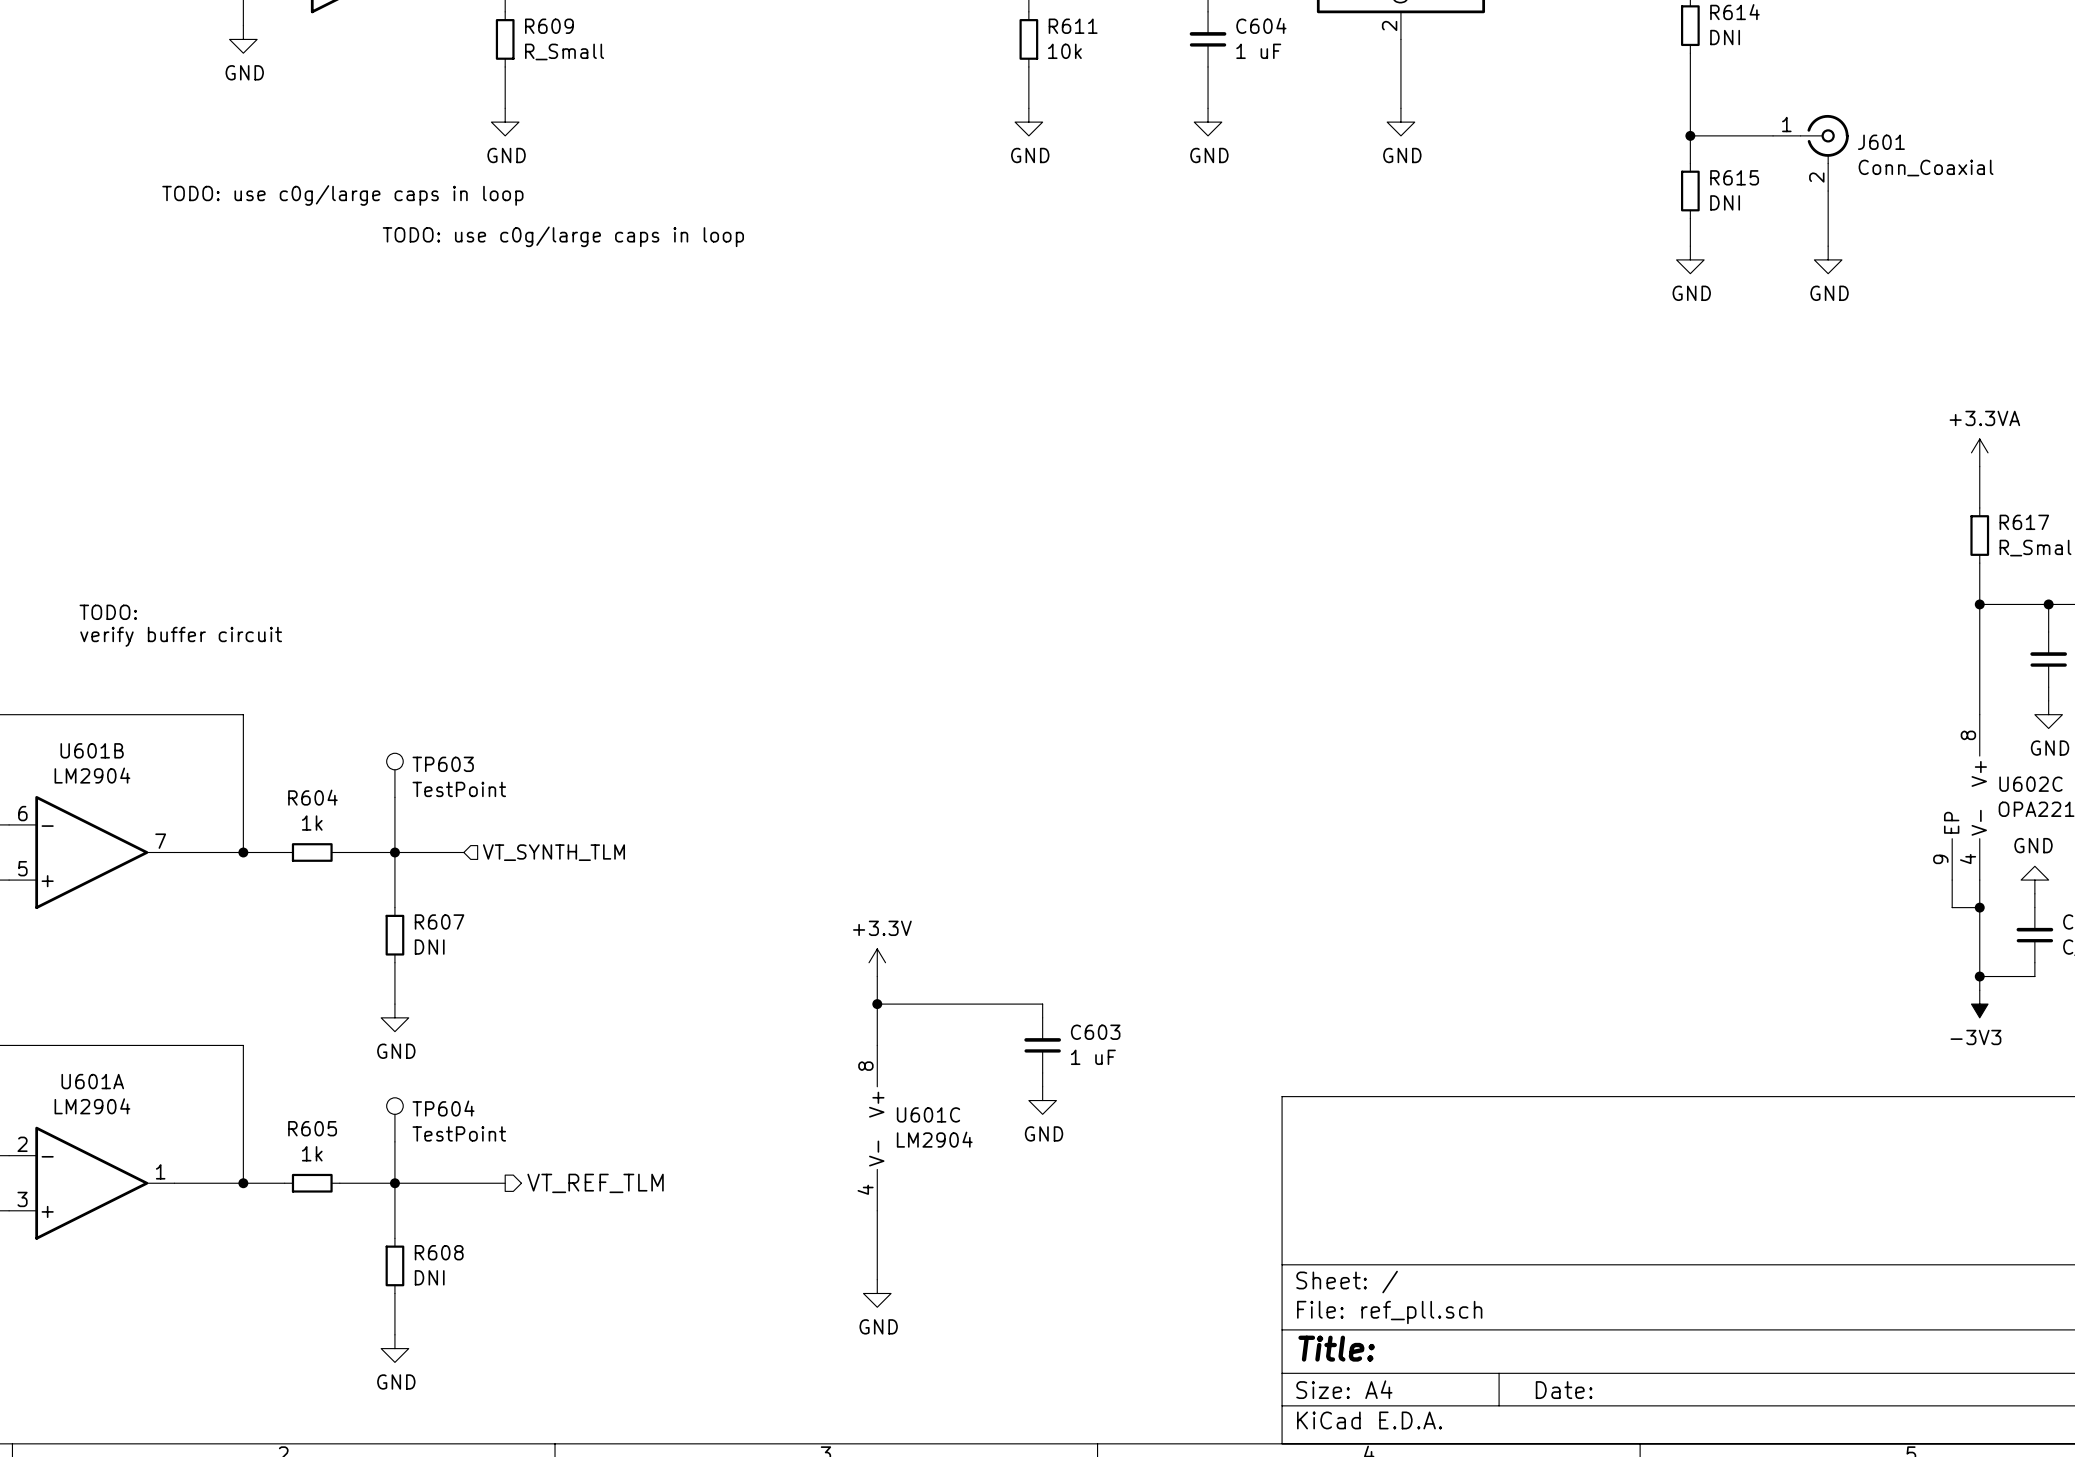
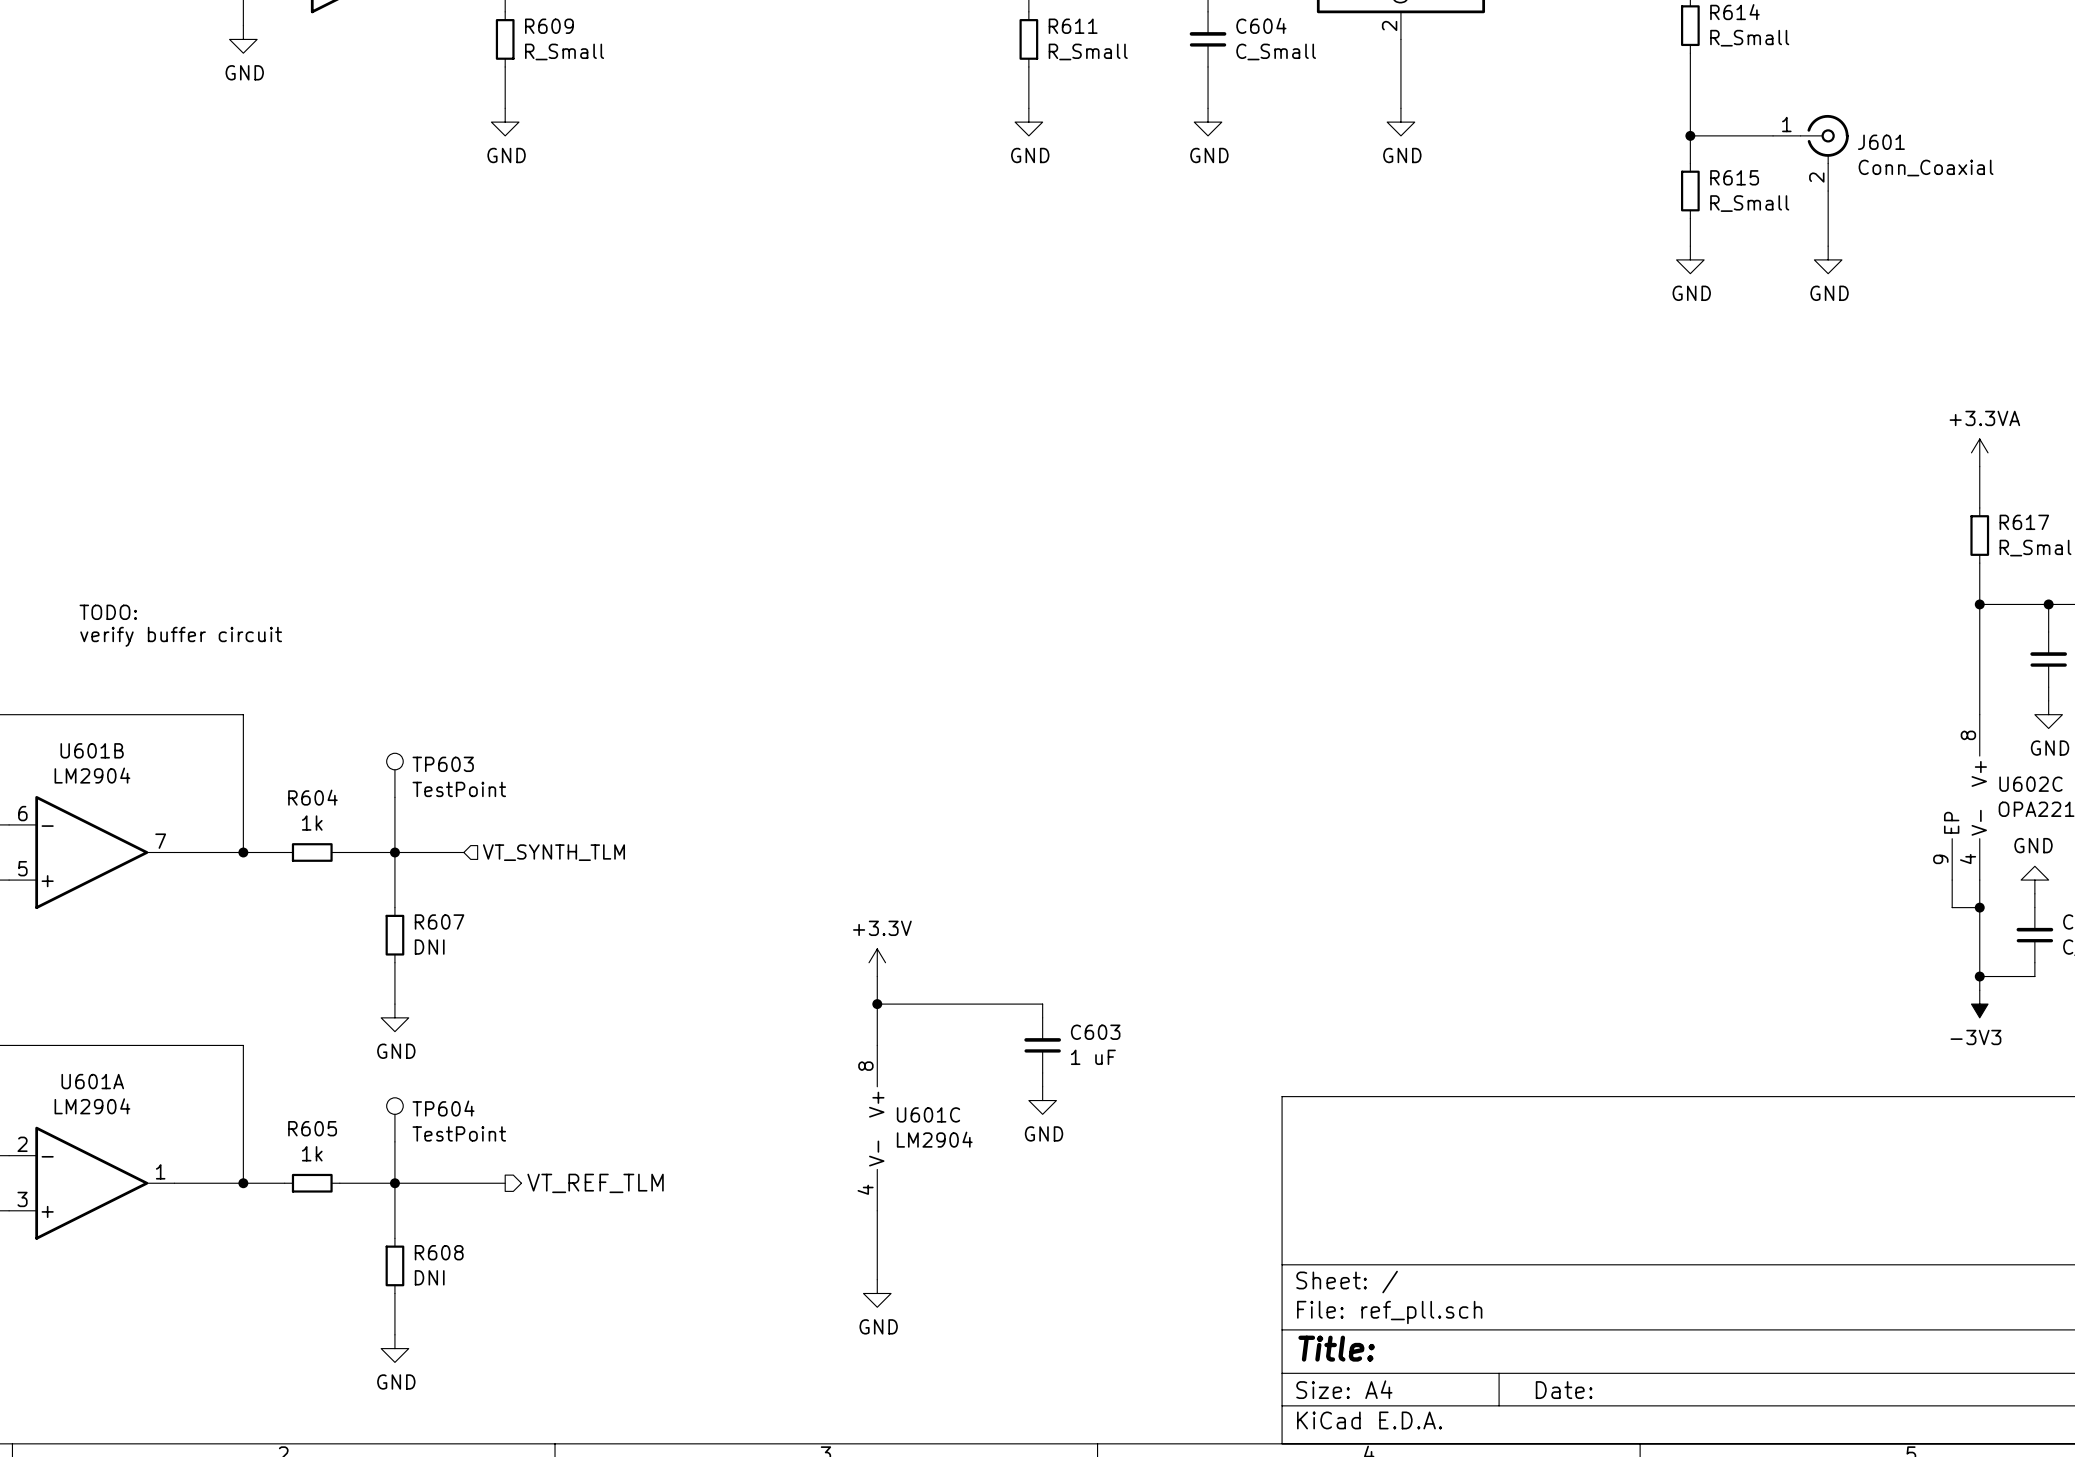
R614 value: DNI (1725, 37) -> R_Small (1749, 38)
R611 value: 10k (1064, 51) -> R_Small (1088, 51)
C604 value: 1 uF (1258, 51) -> C_Small (1276, 51)
text: TODO: use c0g/large caps in loop (342, 195) -> none
R615 value: DNI (1725, 202) -> R_Small (1749, 203)
text: TODO: use c0g/large caps in loop (563, 236) -> none

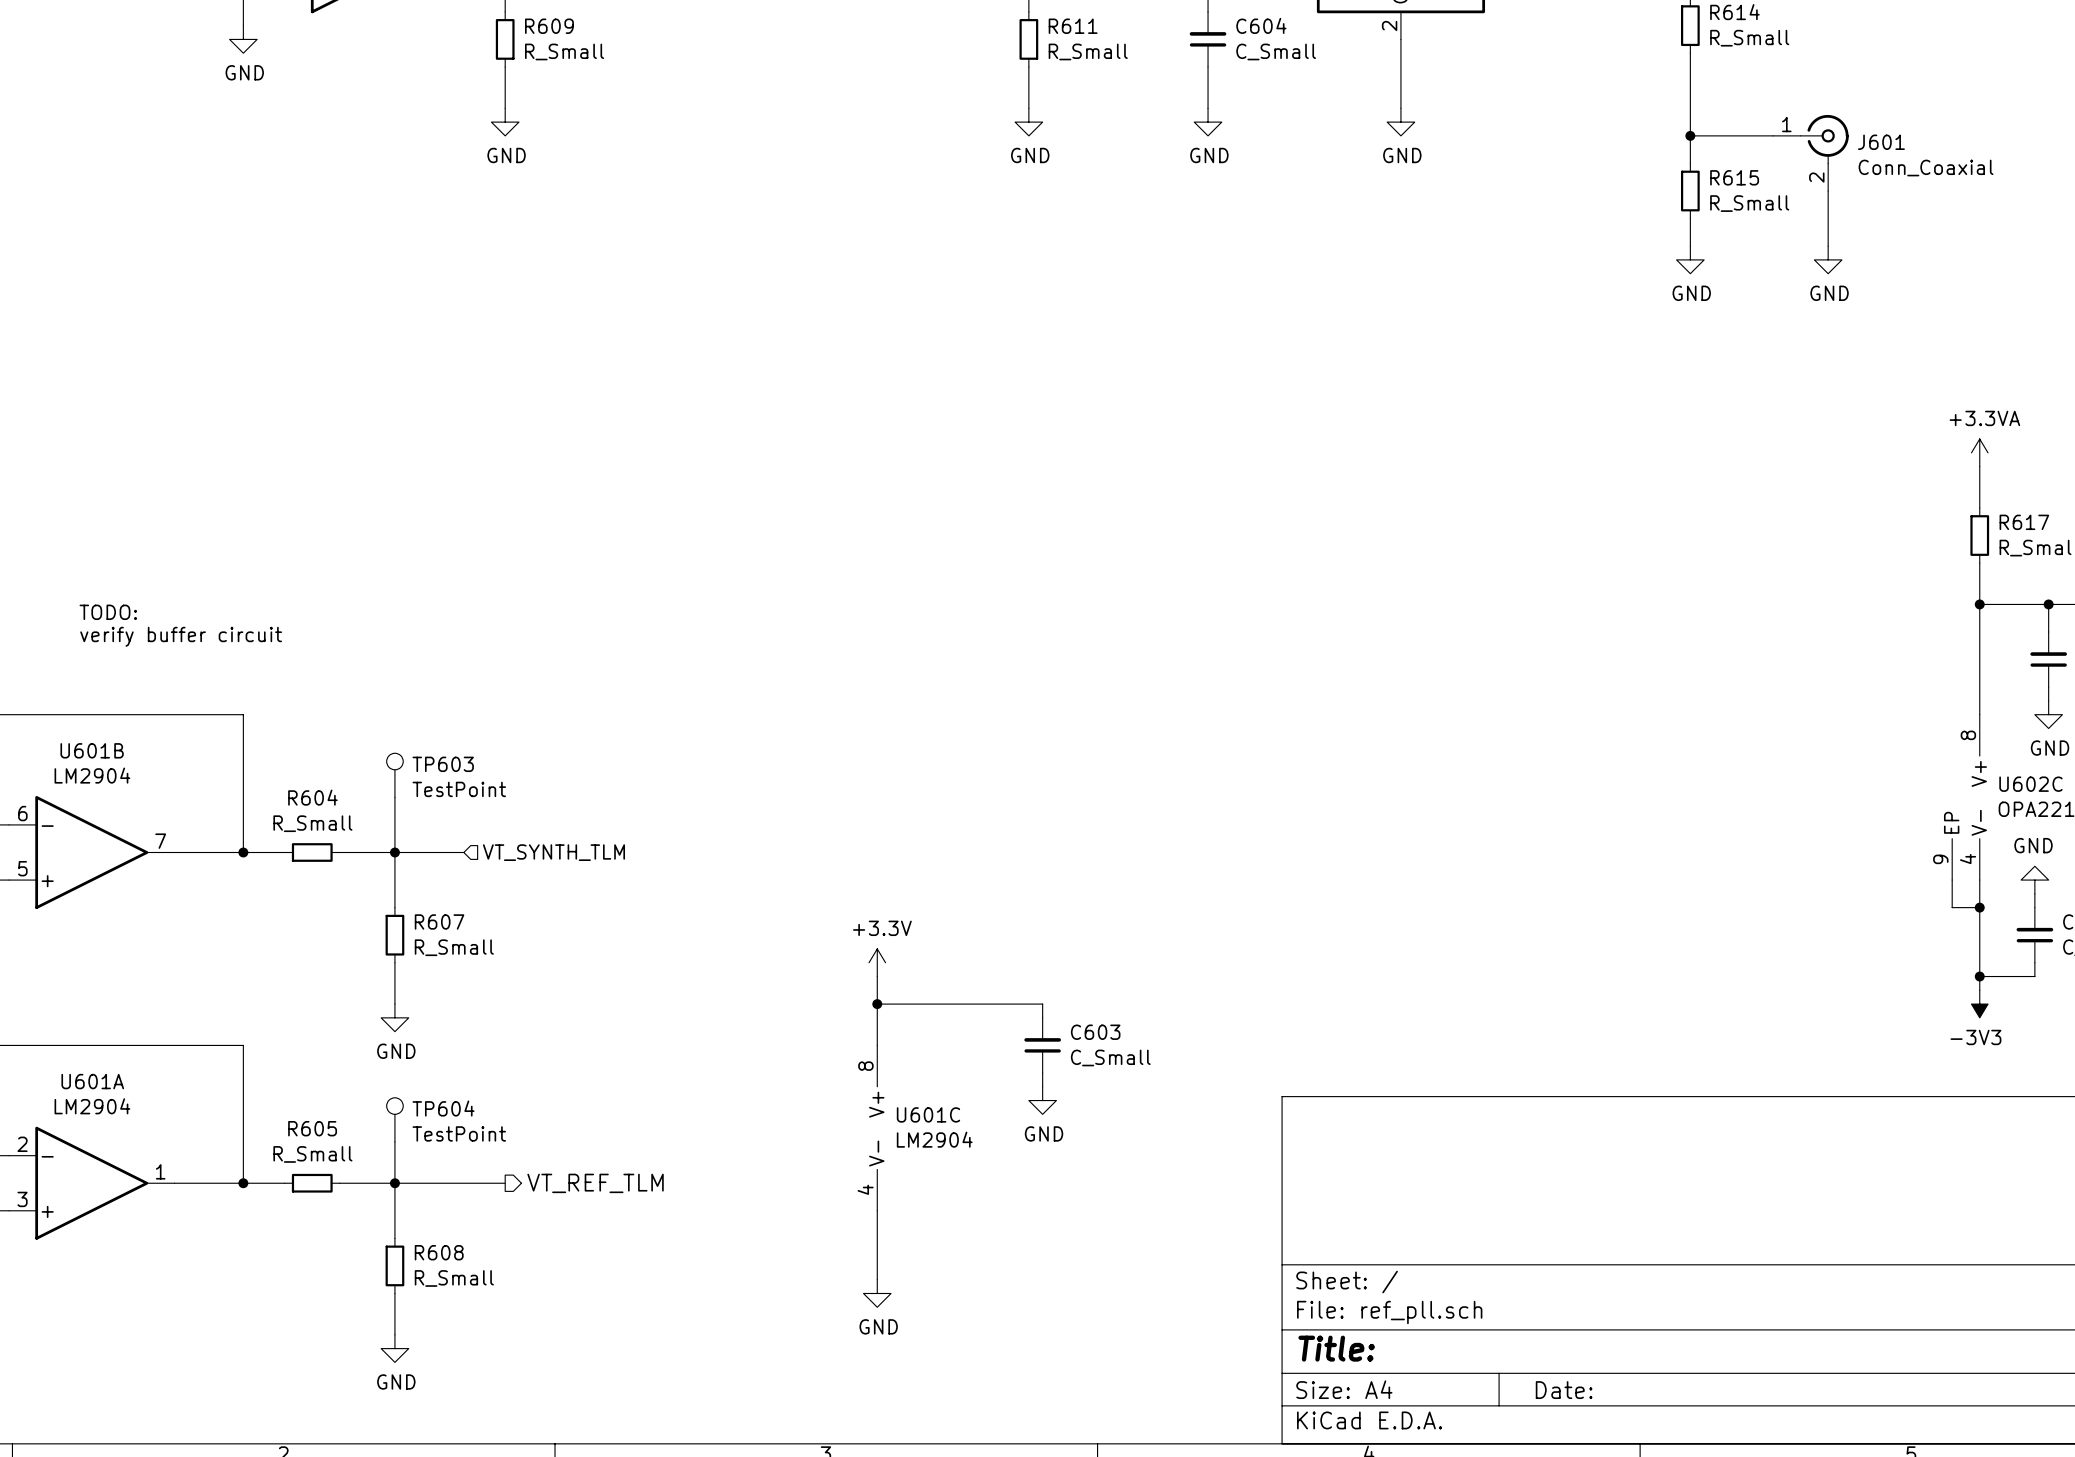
R604 value: 1k (312, 823) -> R_Small (312, 823)
R607 value: DNI (429, 947) -> R_Small (454, 947)
C603 value: 1 uF (1093, 1057) -> C_Small (1110, 1057)
R605 value: 1k (312, 1153) -> R_Small (312, 1154)
R608 value: DNI (429, 1277) -> R_Small (454, 1278)

